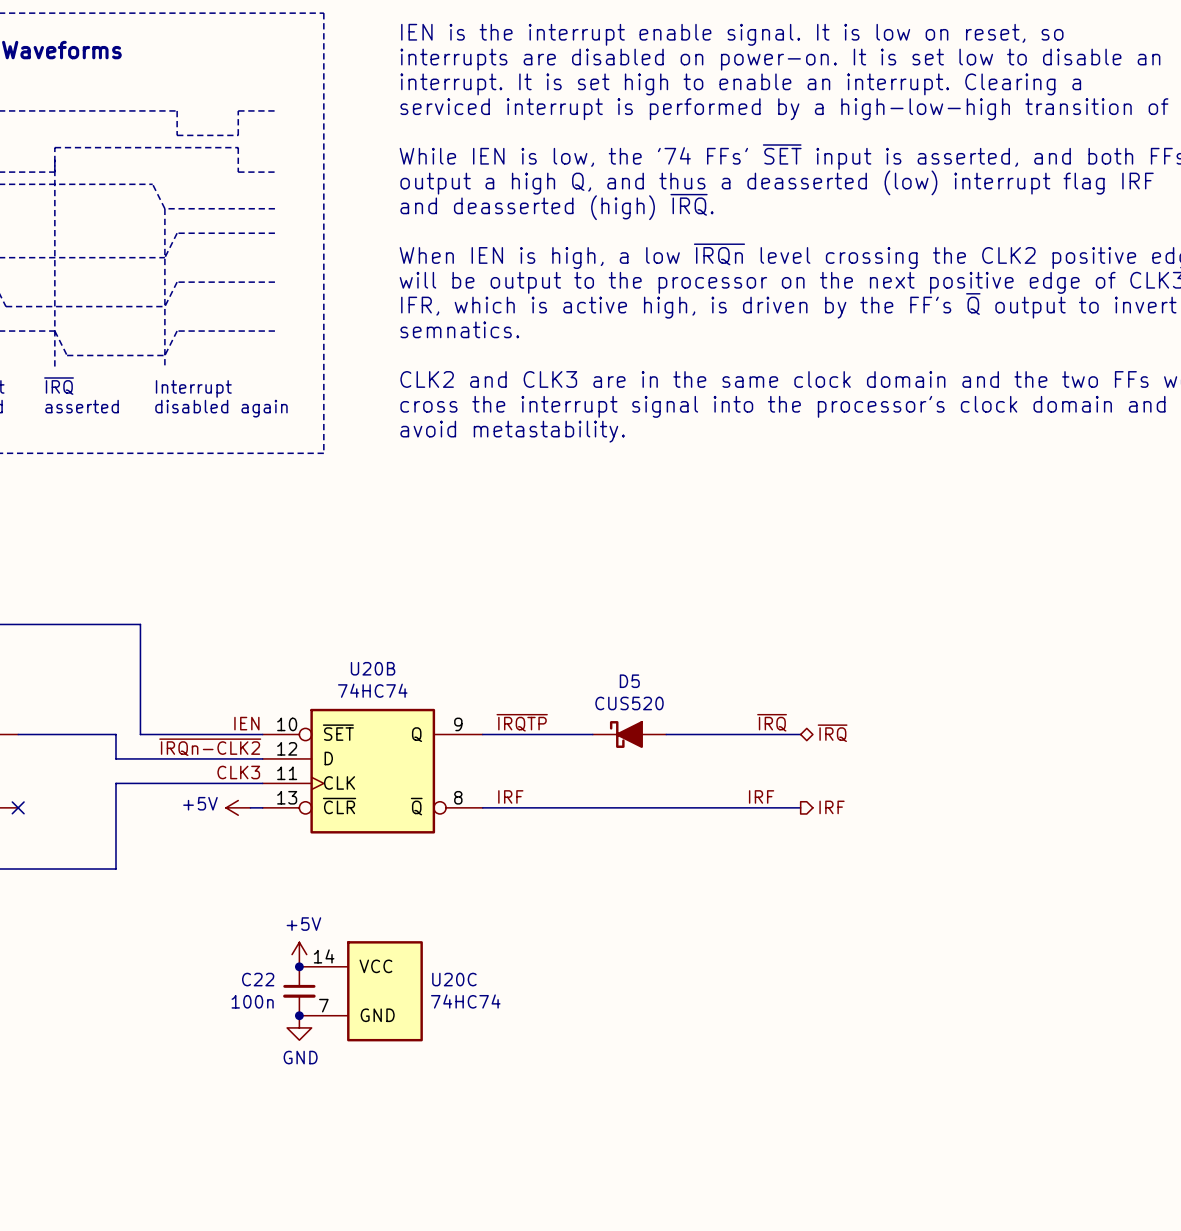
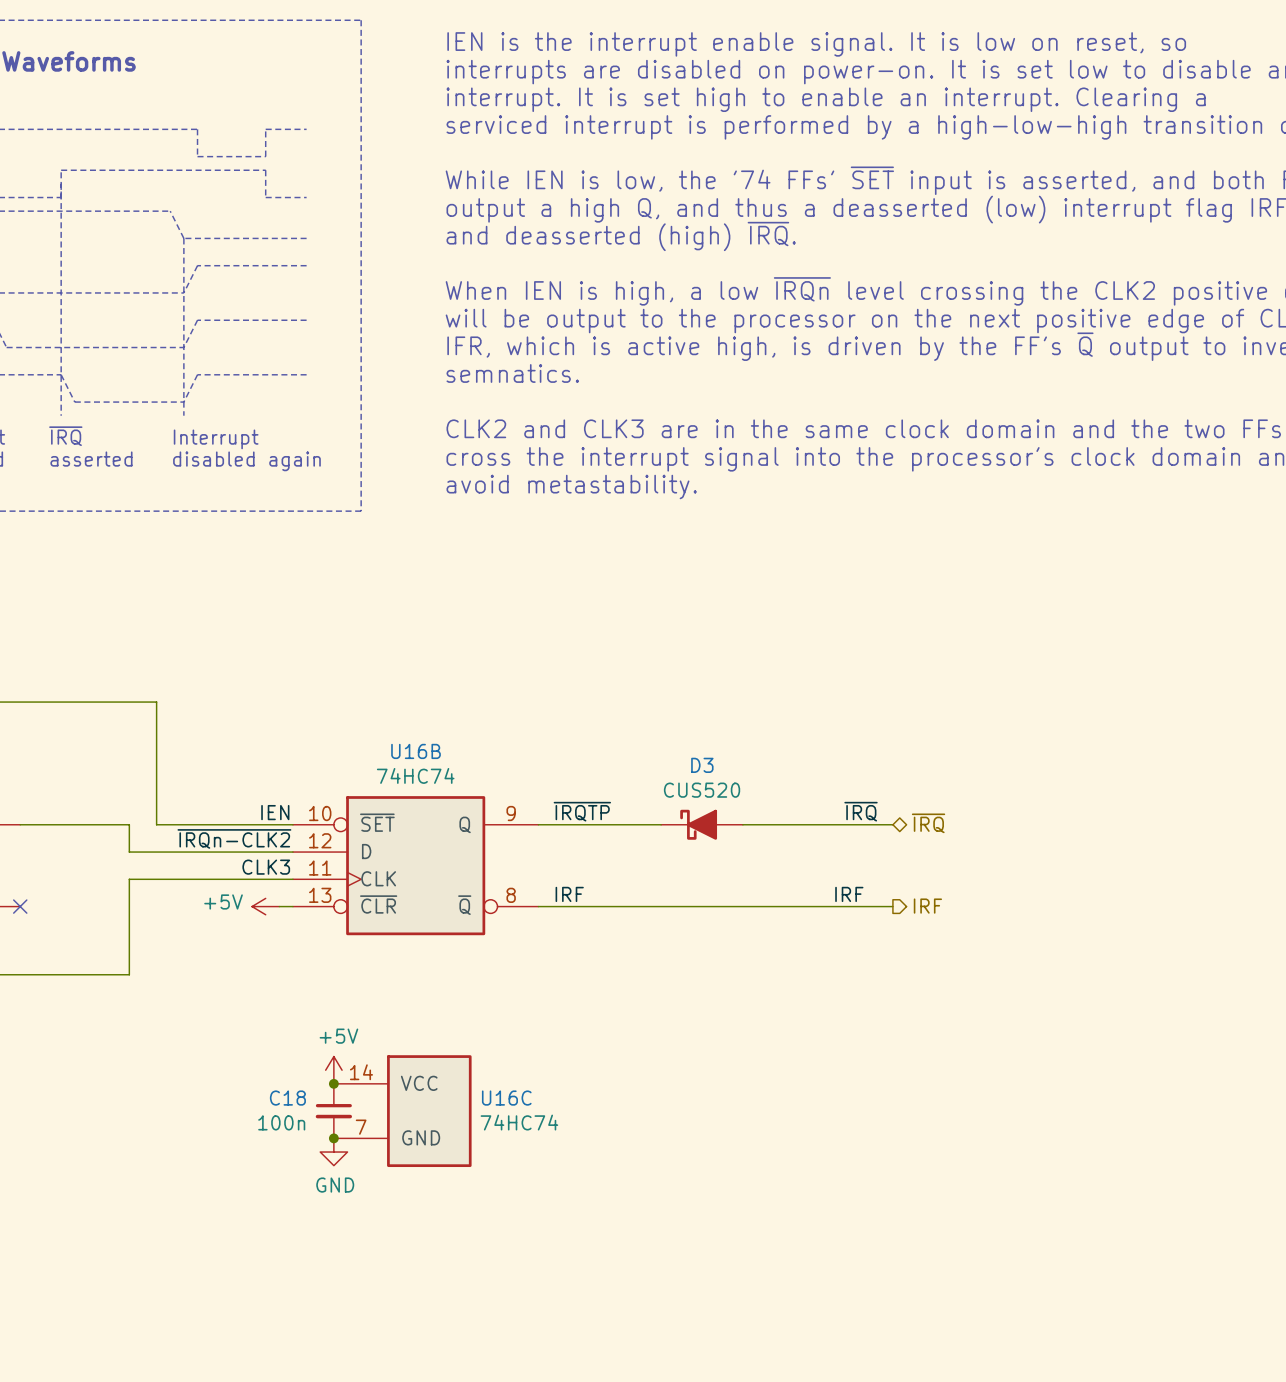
U20B name: U20B (373, 668) -> U16B (416, 751)
D5 name: D5 (629, 681) -> D3 (702, 765)
C22 name: C22 (258, 979) -> C18 (287, 1098)
U20C name: U20C (454, 979) -> U16C (506, 1098)

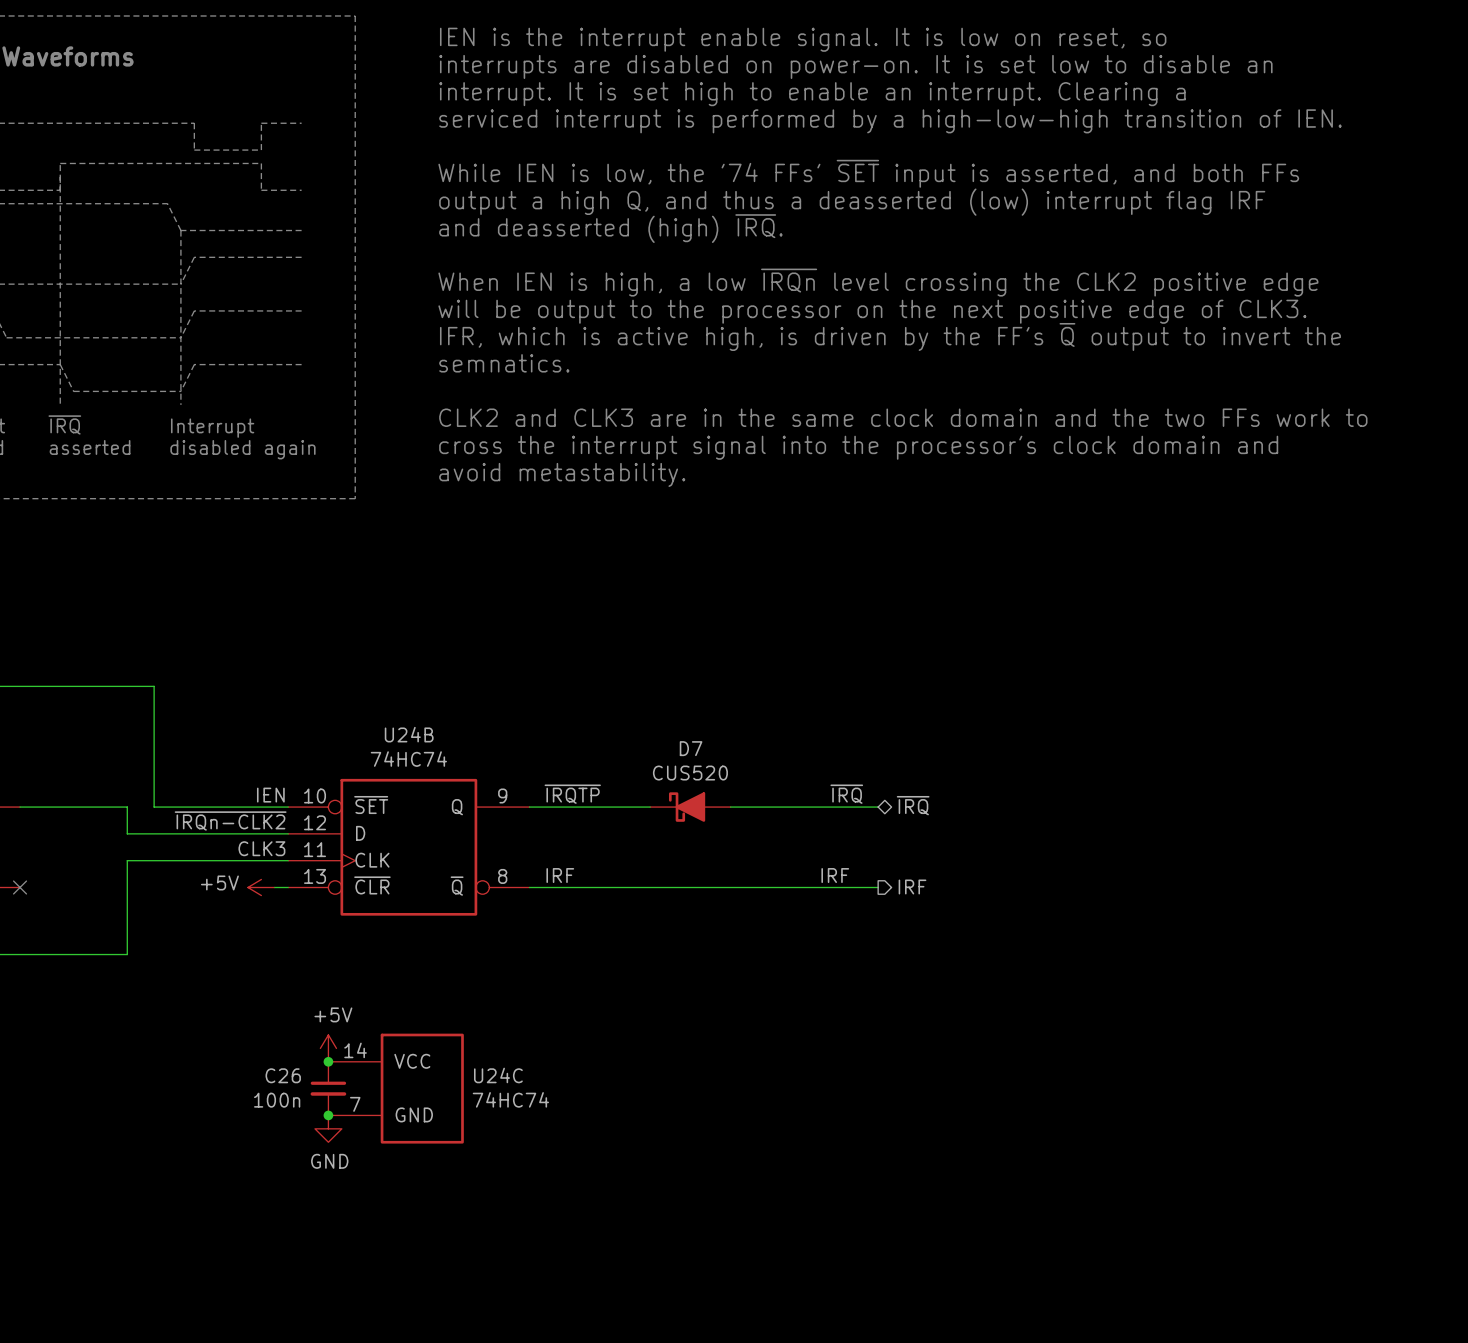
U16B name: U16B (416, 751) -> U24B (409, 734)
D3 name: D3 (702, 765) -> D7 (691, 748)
C18 name: C18 (287, 1098) -> C26 (283, 1075)
U16C name: U16C (506, 1098) -> U24C (498, 1075)

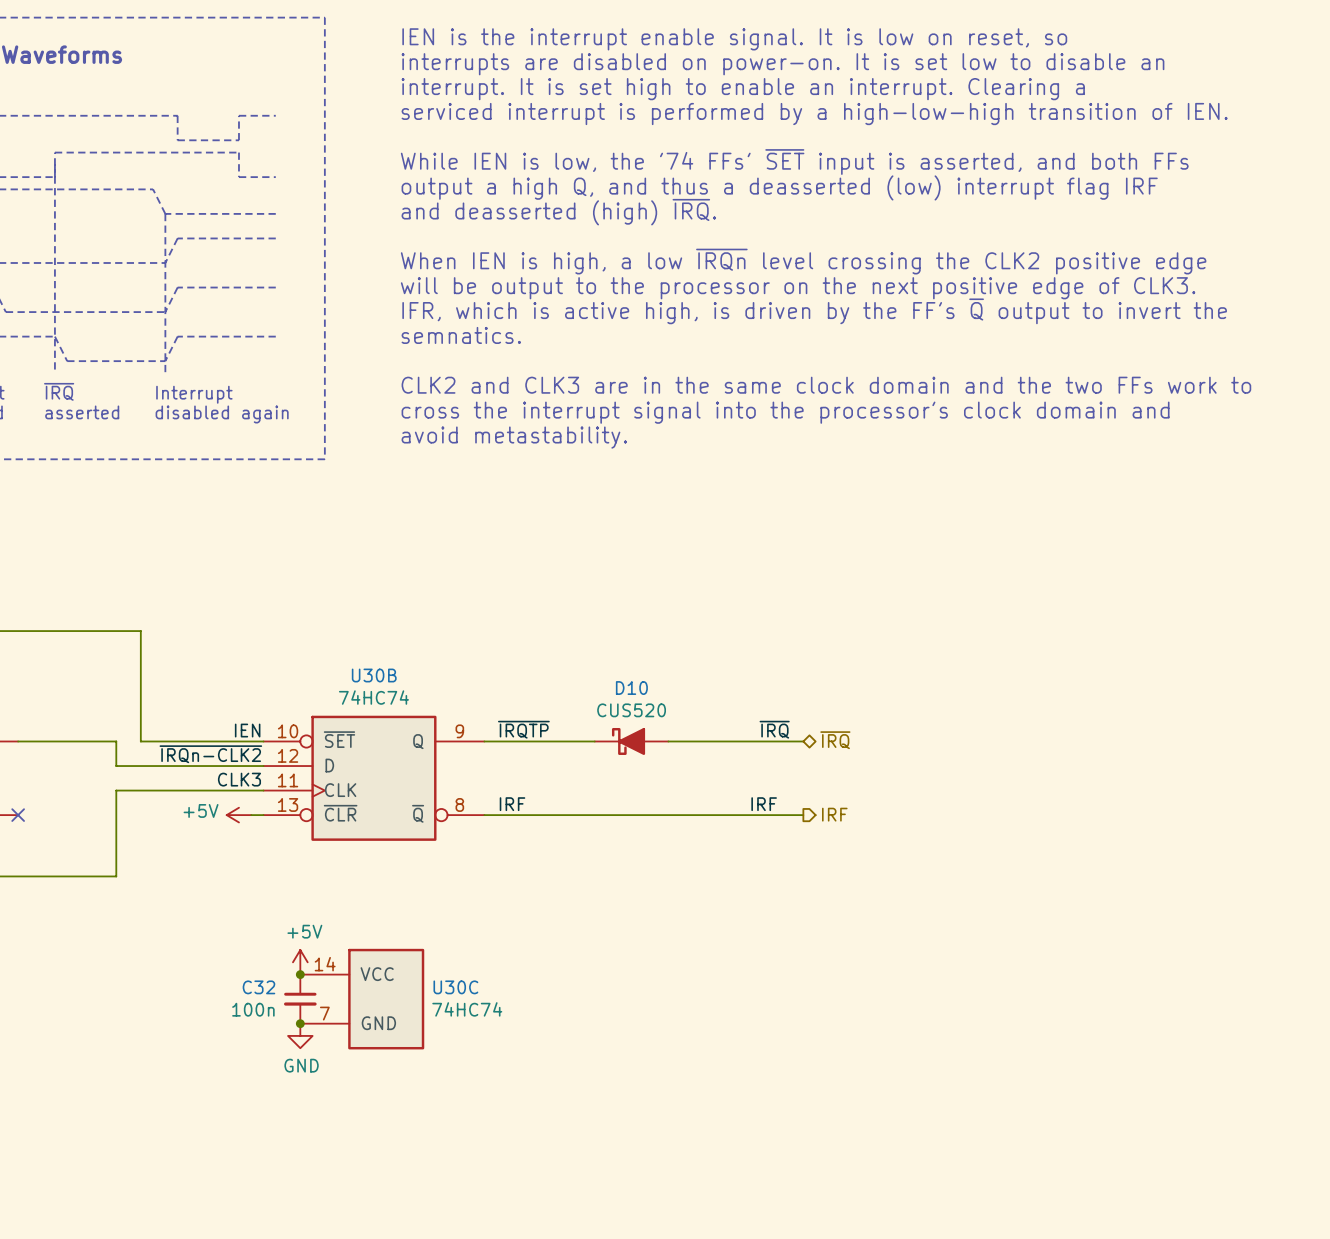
U24B name: U24B (409, 734) -> U30B (374, 675)
D7 name: D7 (691, 748) -> D10 (631, 688)
C26 name: C26 (283, 1075) -> C32 (258, 987)
U24C name: U24C (498, 1075) -> U30C (455, 987)

